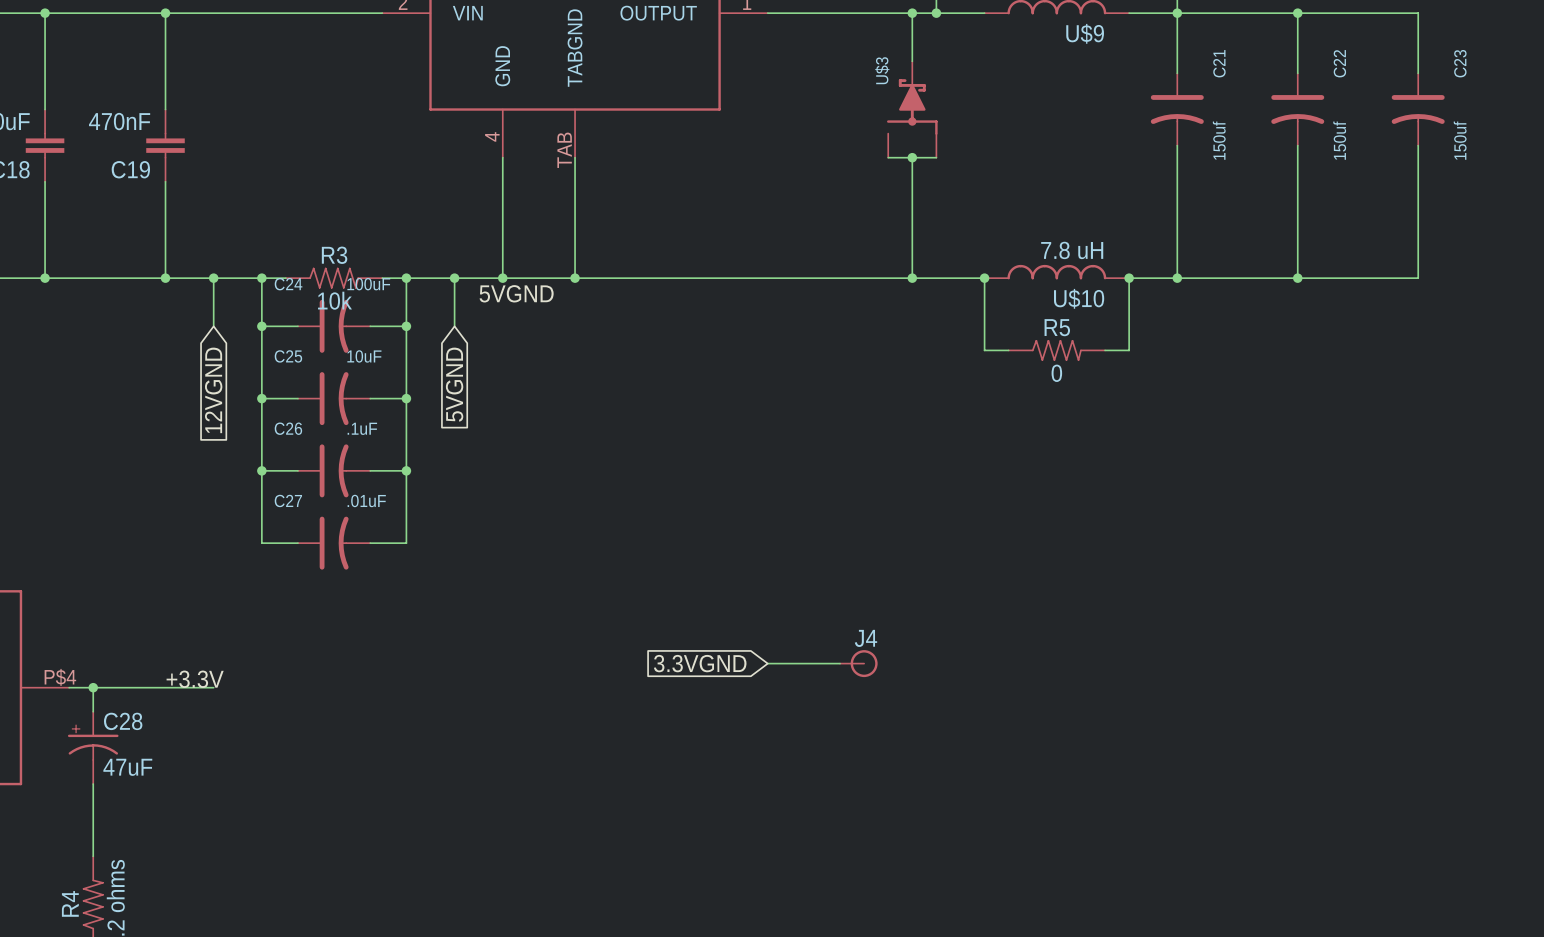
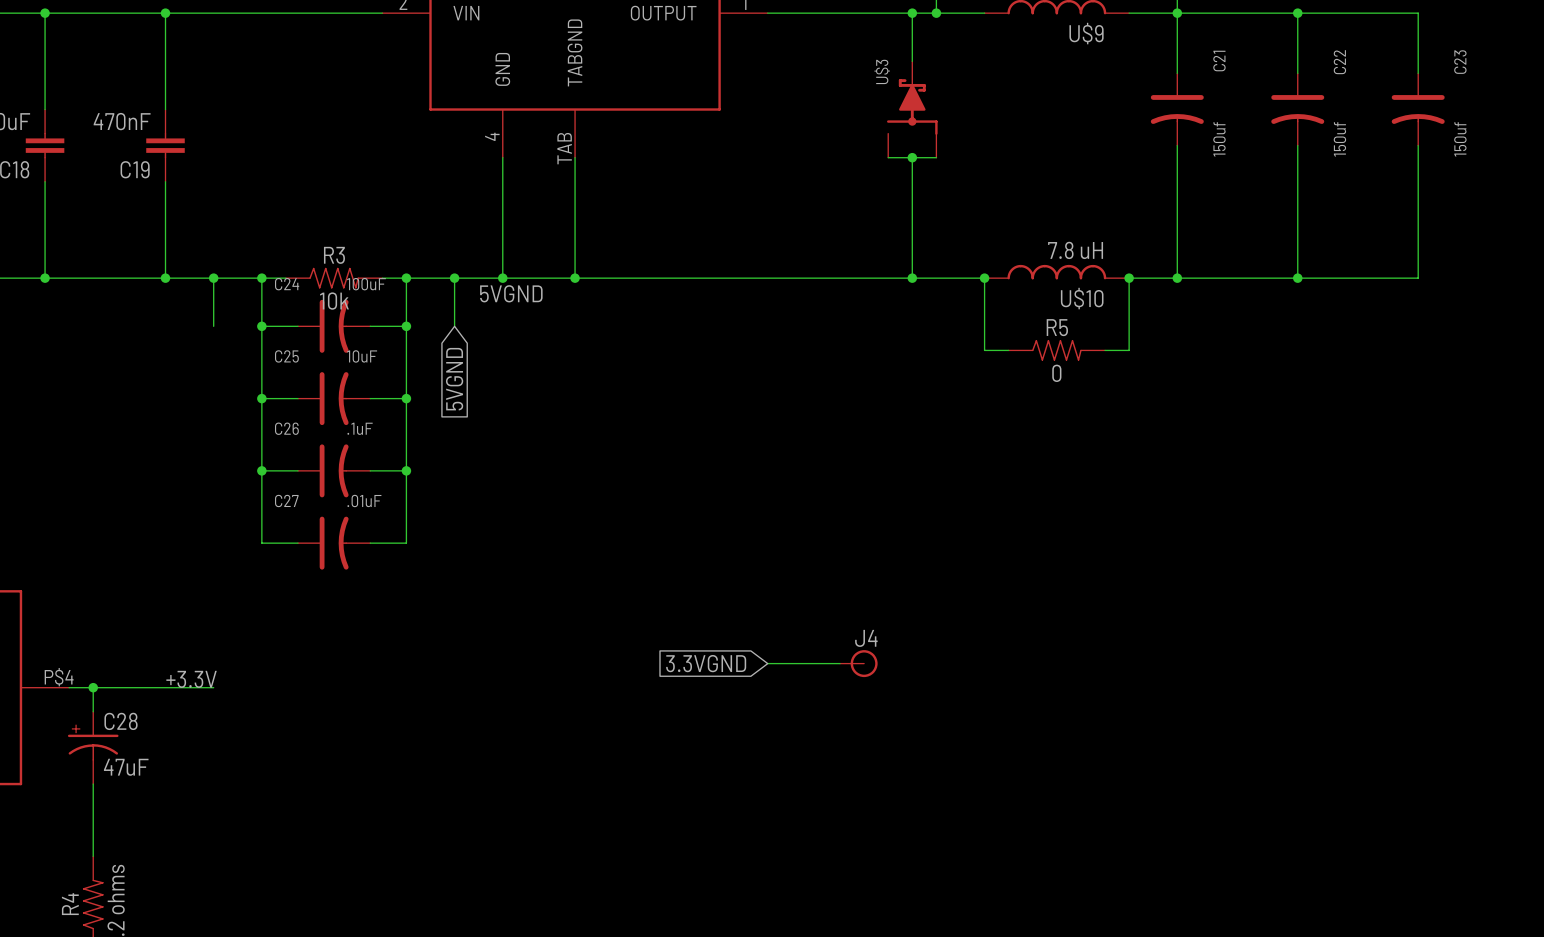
global label: 12VGND (213, 390) -> none

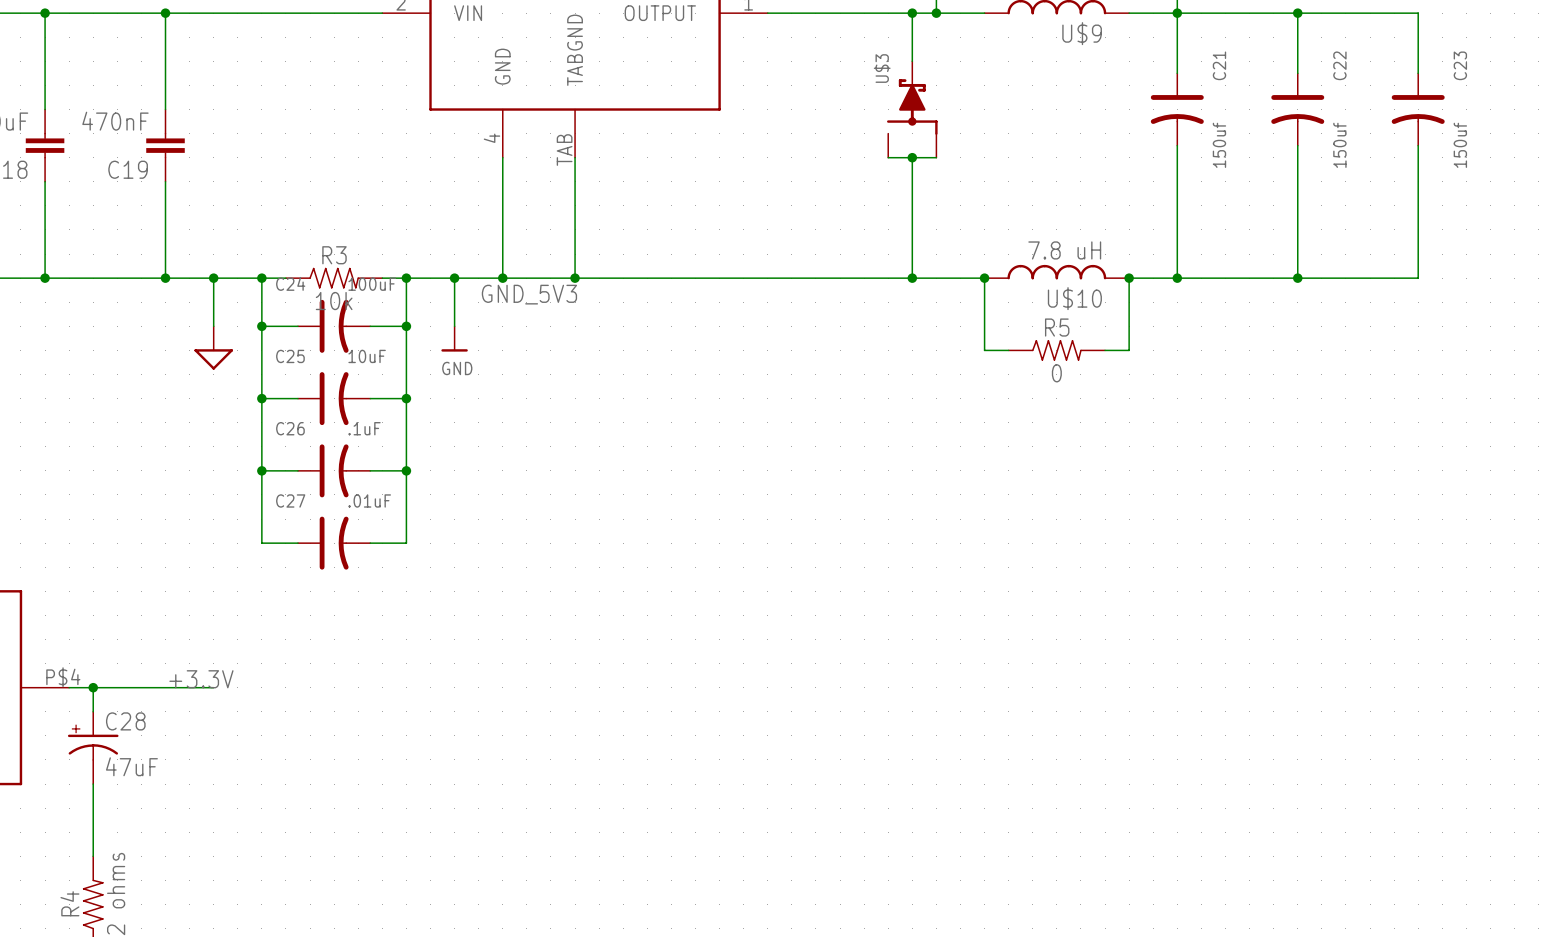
label: 5VGND (511, 293) -> GND_5V3 (529, 294)
power symbol: none -> GND (454, 338)
power symbol: none -> (213, 348)
global label: 5VGND (454, 379) -> none
global label: 3.3VGND (706, 663) -> none
wire: (767, 663) (840, 663) -> none
J4: (858, 663) -> none

